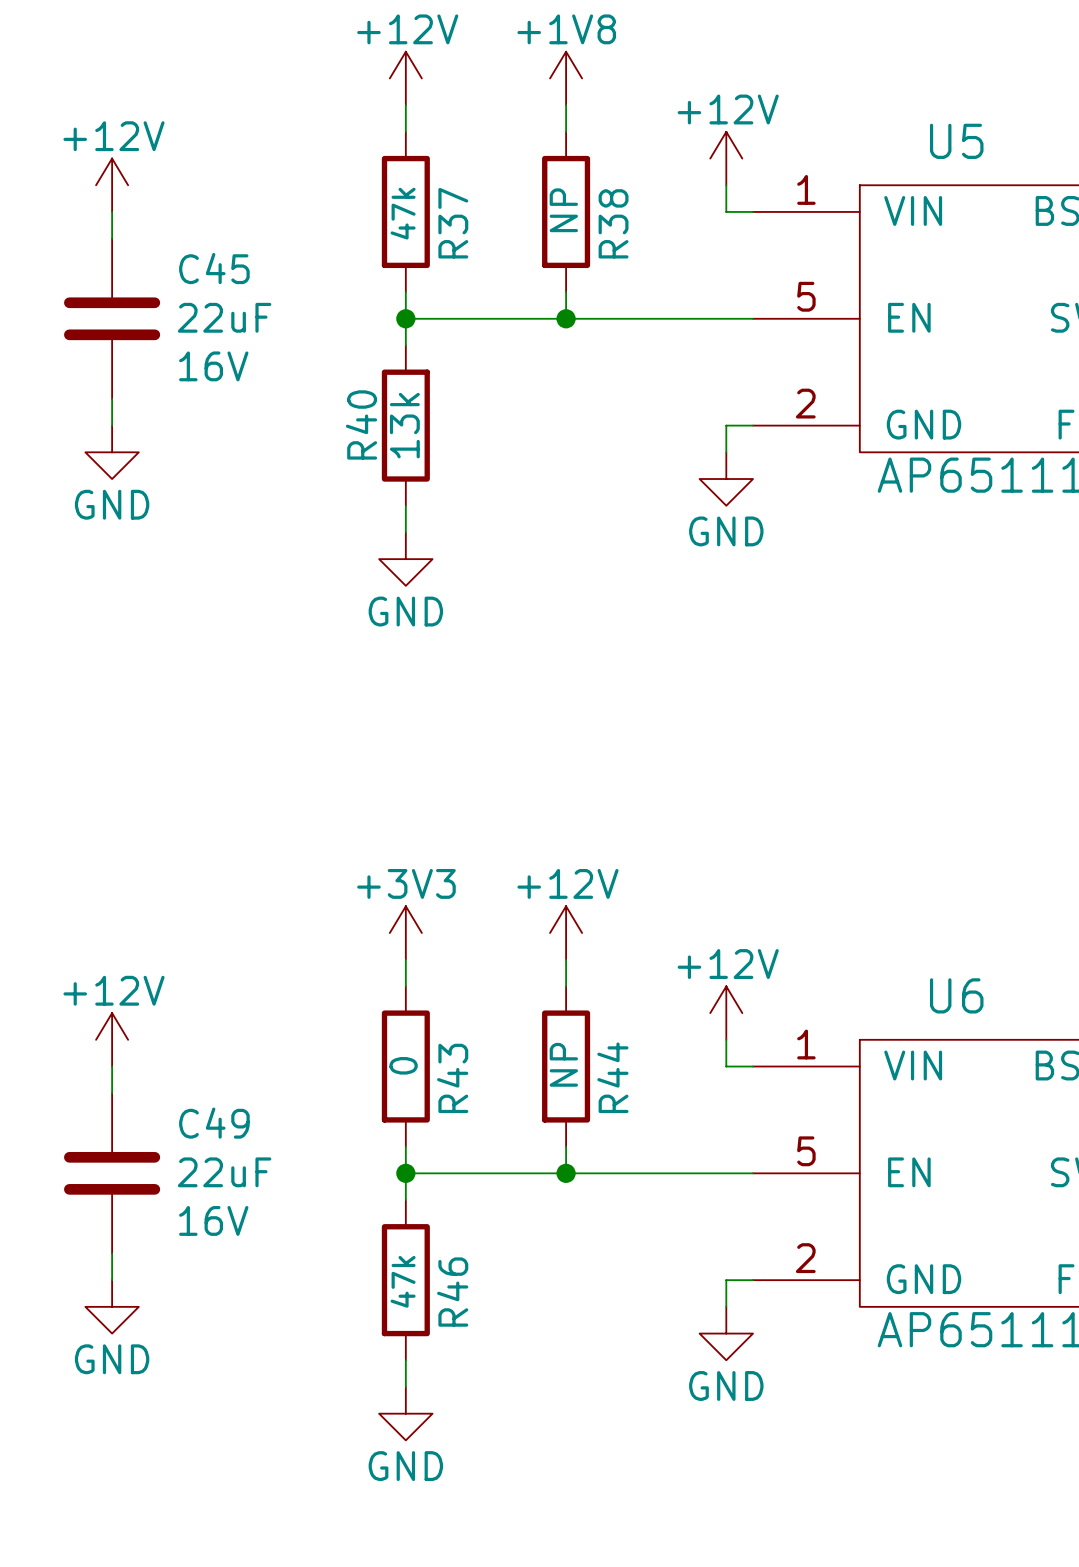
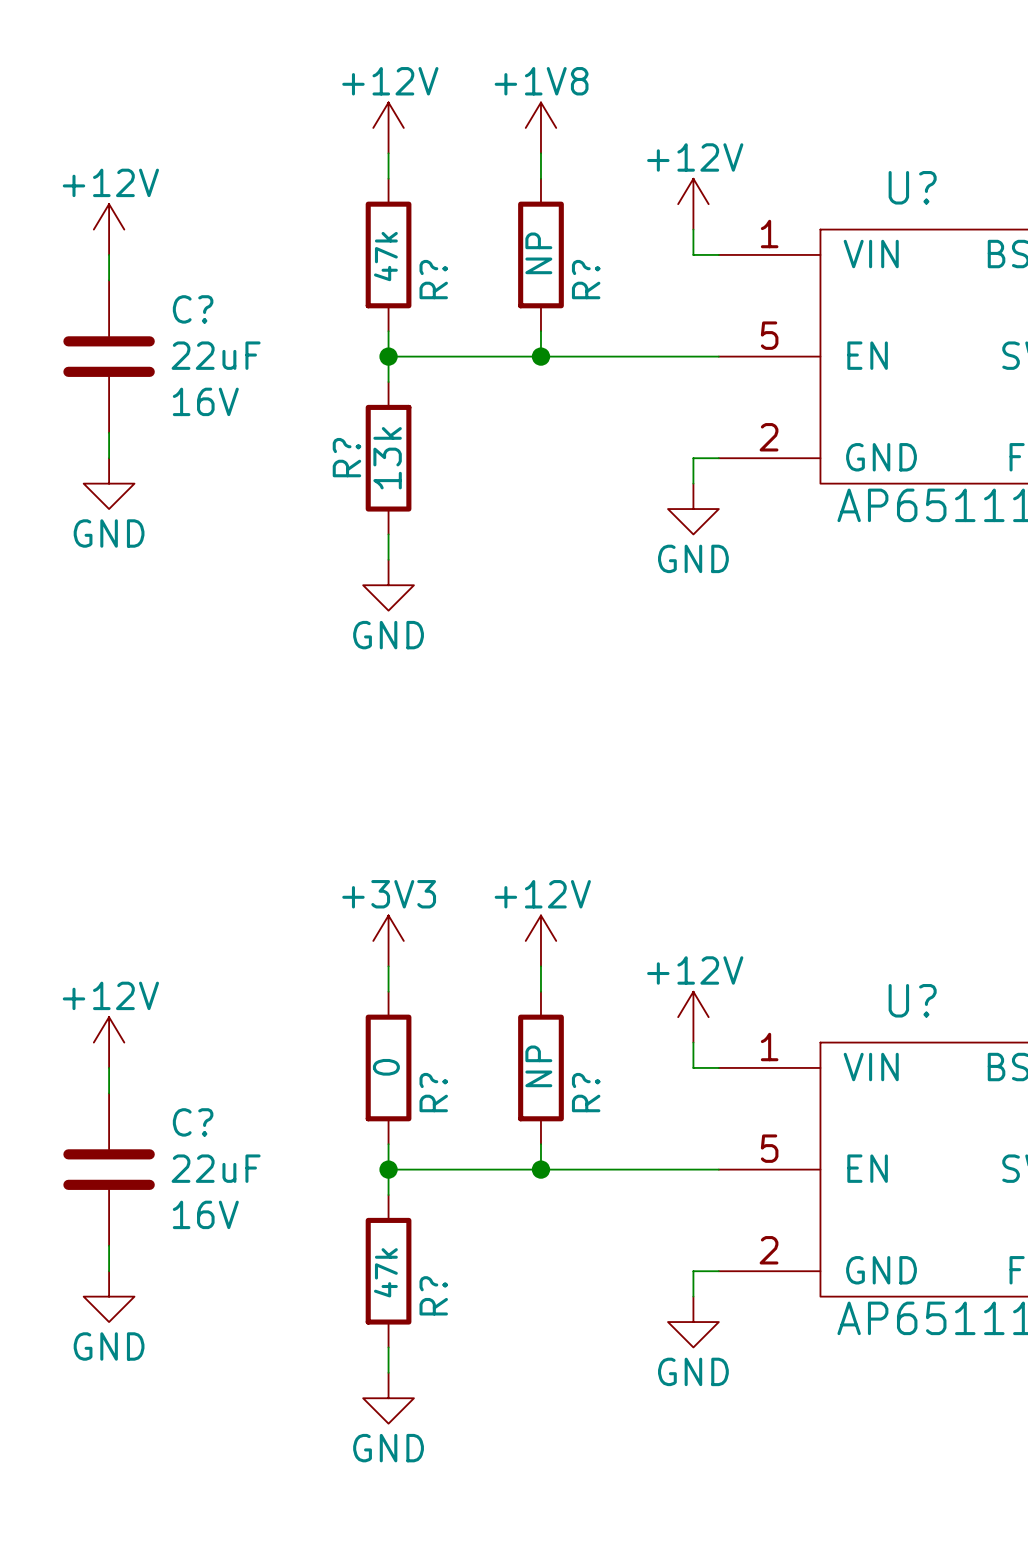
U5 name: U5 (956, 141) -> U? (912, 187)
R37 name: R37 (453, 223) -> R? (433, 279)
R38 name: R38 (613, 223) -> R? (586, 279)
C45 name: C45 (214, 268) -> C? (193, 309)
R40 name: R40 (361, 424) -> R? (346, 457)
U6 name: U6 (956, 995) -> U? (912, 1000)
R44 name: R44 (612, 1077) -> R? (586, 1092)
R43 name: R43 (452, 1078) -> R? (433, 1092)
C49 name: C49 (214, 1123) -> C? (193, 1122)
R46 name: R46 (452, 1292) -> R? (433, 1295)

